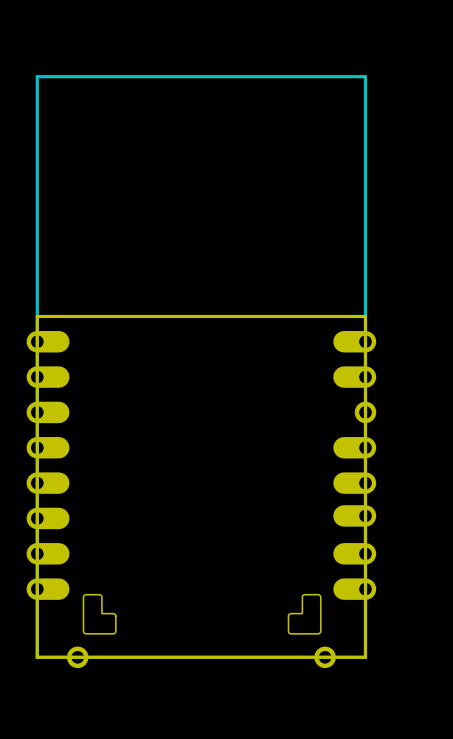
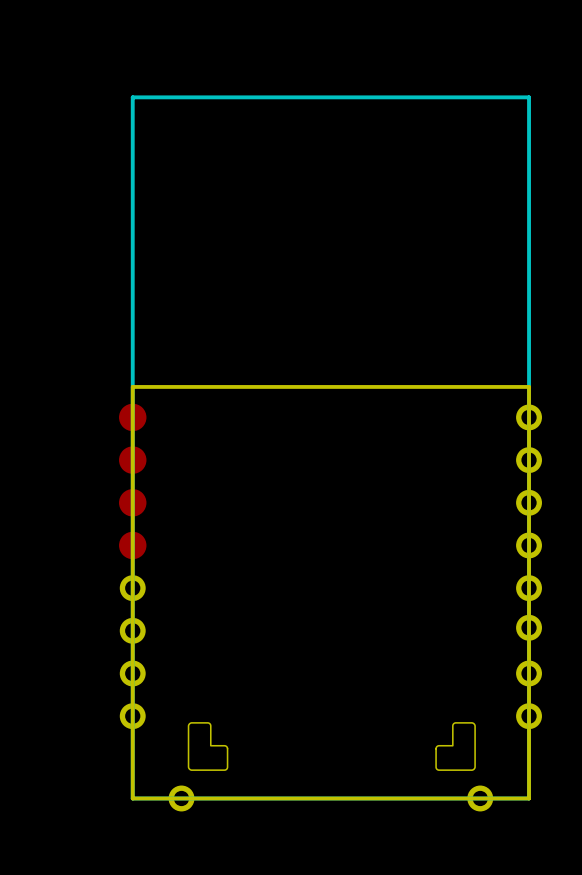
part footprint: [26, 75, 377, 669] -> [119, 95, 542, 812]

